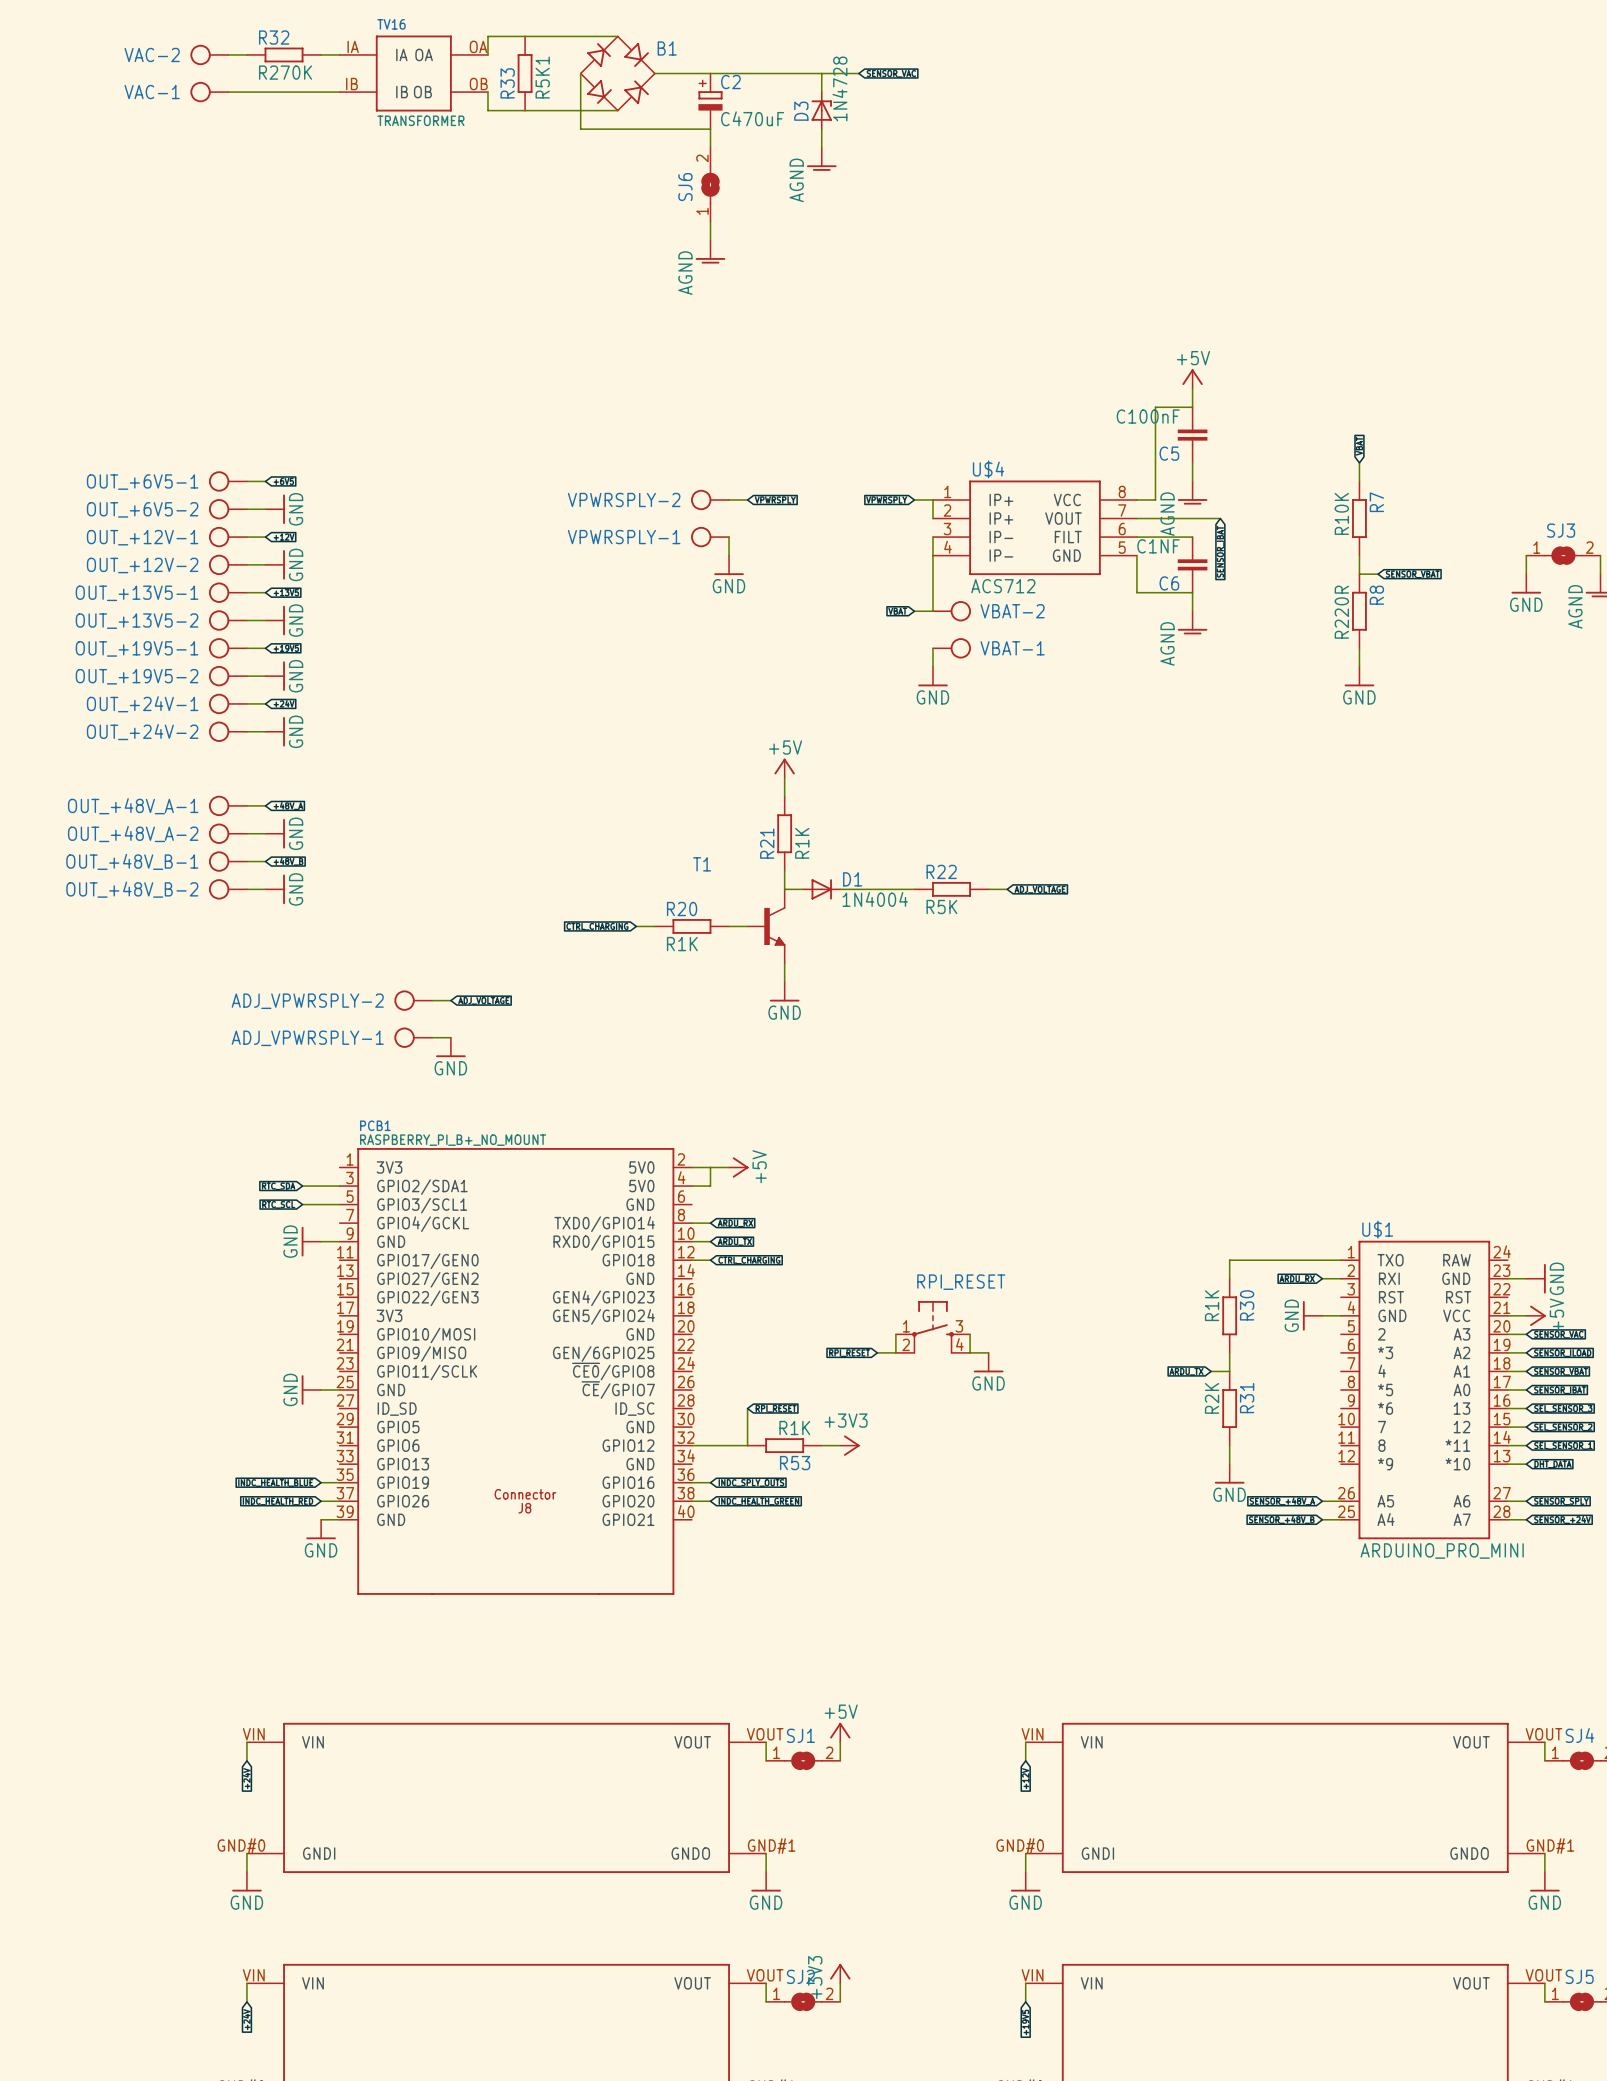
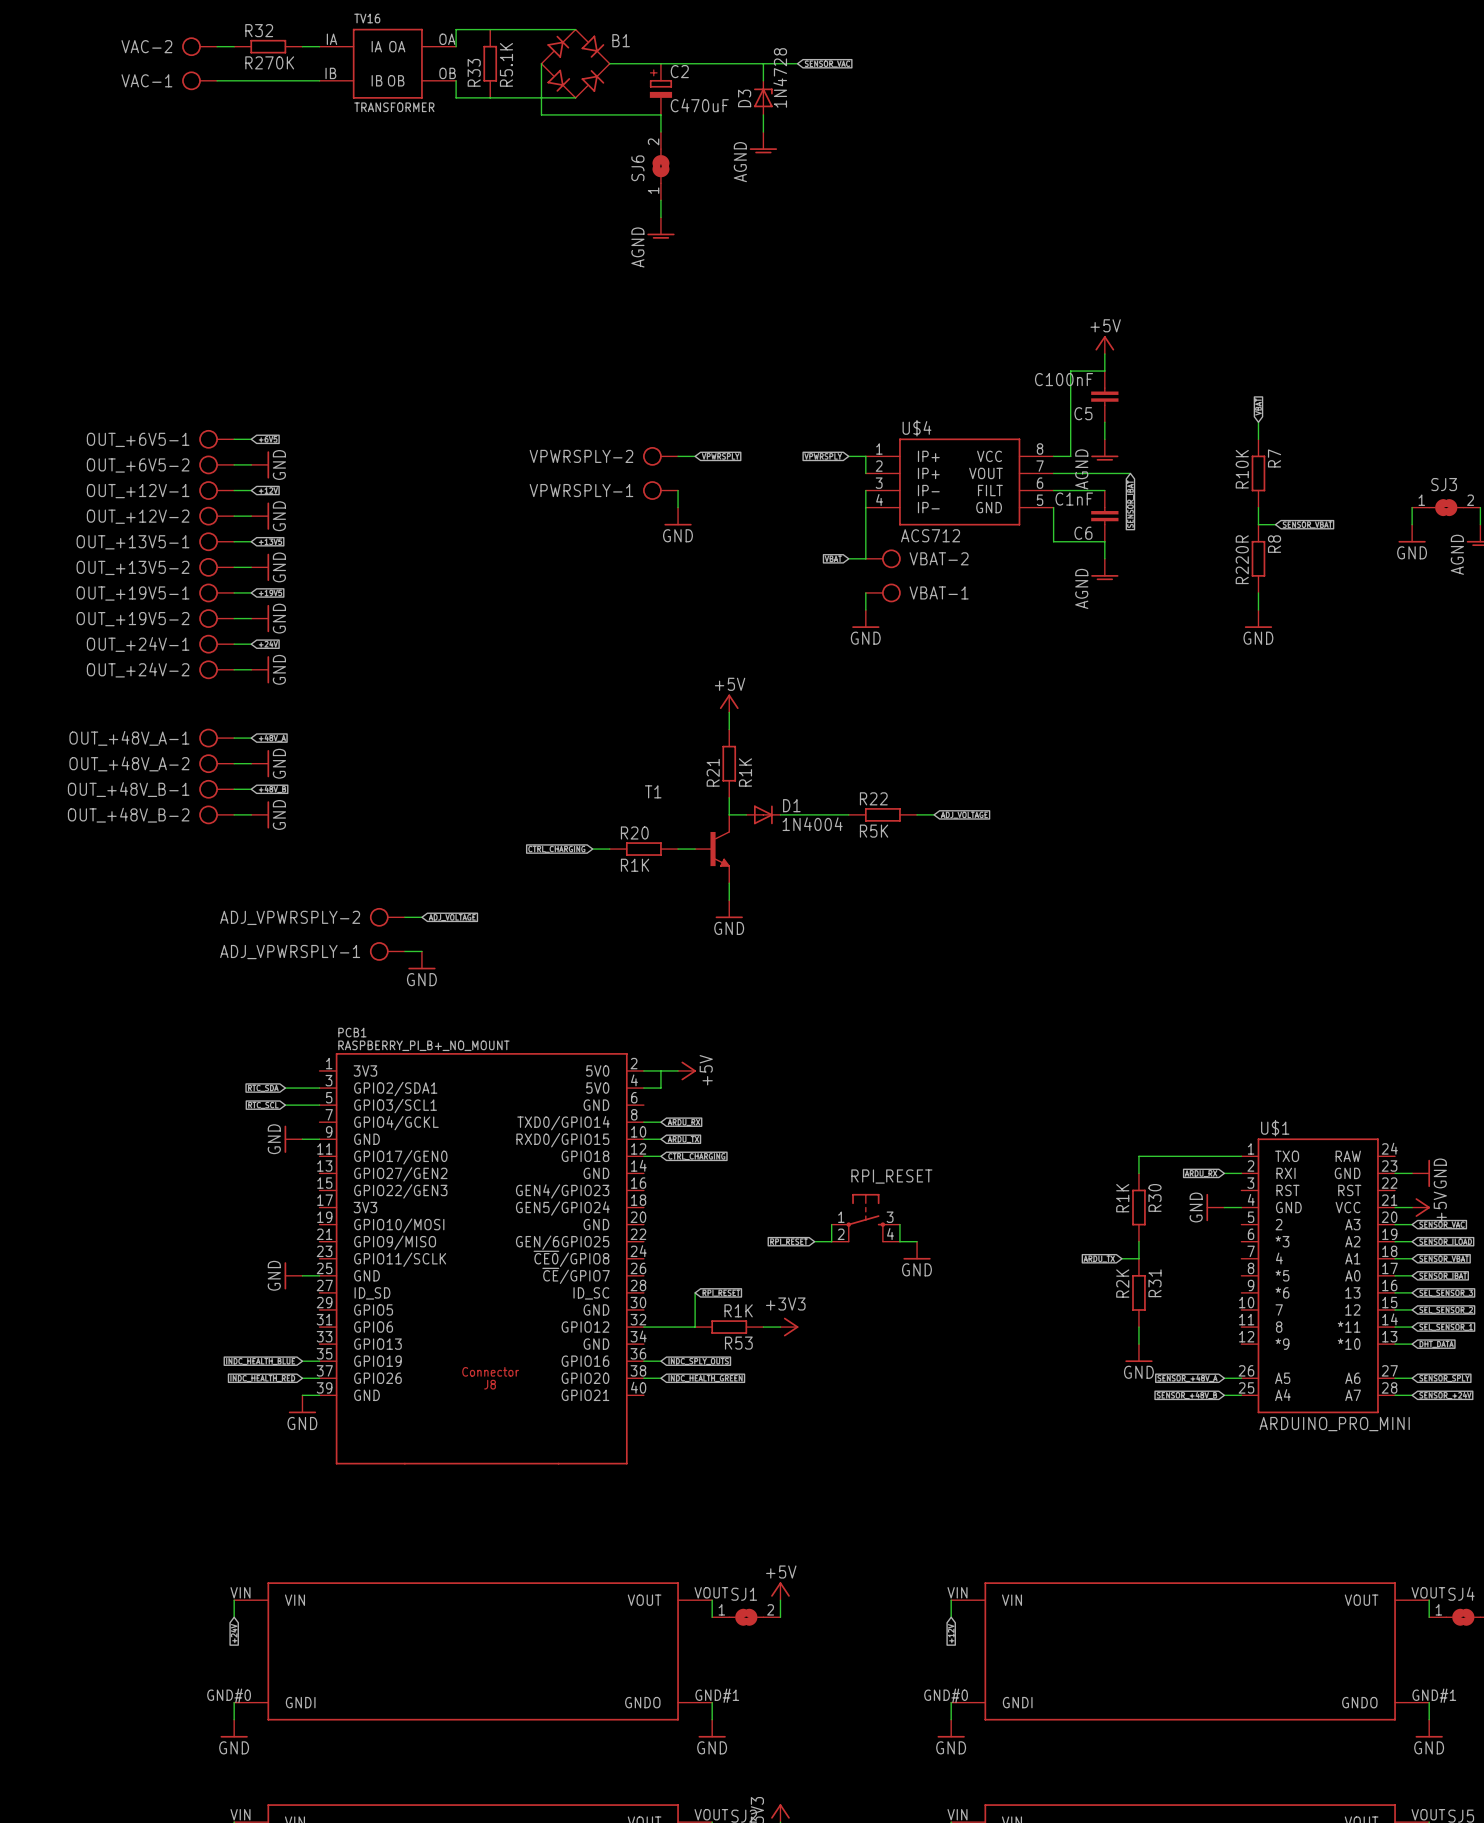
R33 value: R5K1 (542, 77) -> R5.1K (506, 64)
C6 value: C1NF (1158, 546) -> C1nF (1074, 499)

